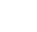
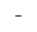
bus: none -> (15, 15) (20, 15)

